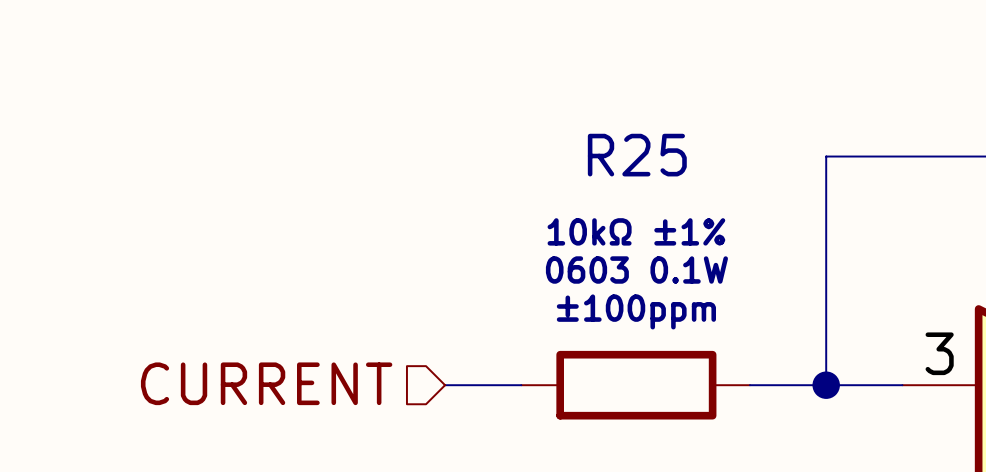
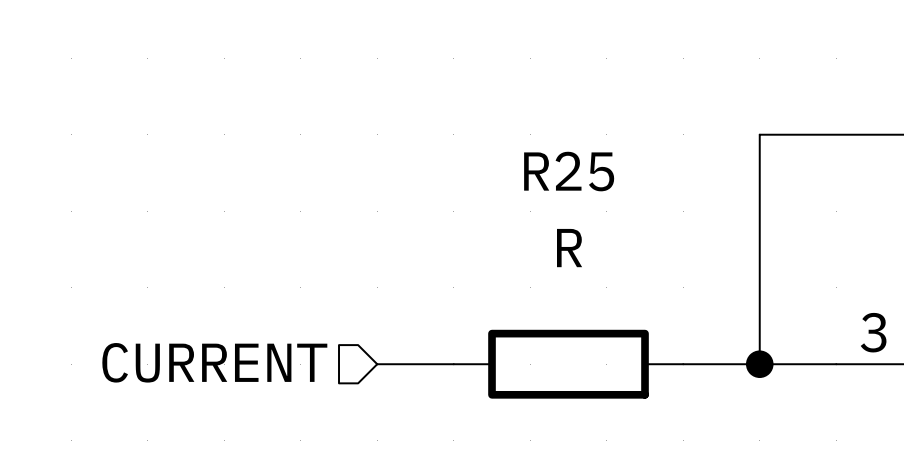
R25 name position: R25 (637, 155) -> R25 (569, 171)
R25 text: 10kΩ ±1% (636, 231) -> none
R25 value: none -> R (569, 248)
R25 text: 0603 0.1W (636, 270) -> none
R25 text: ±100ppm (636, 311) -> none

